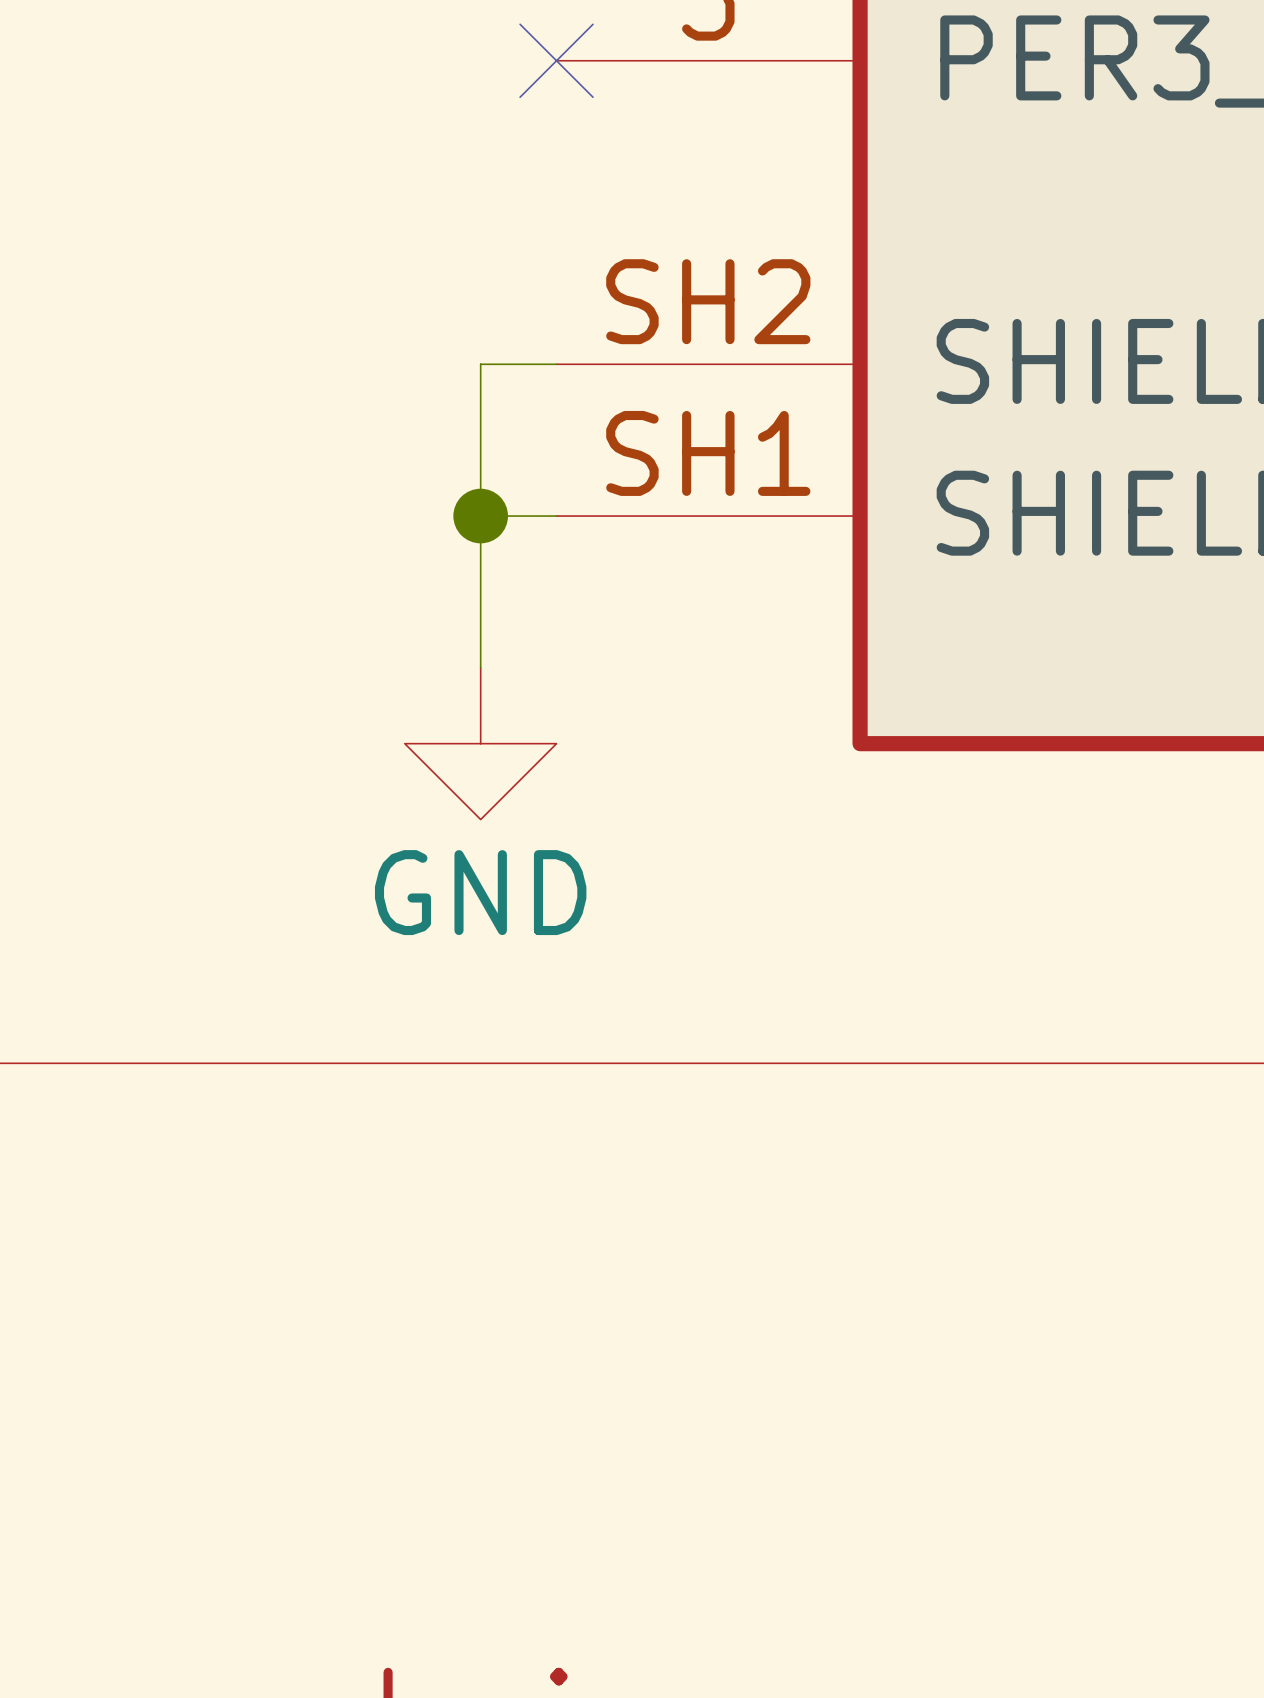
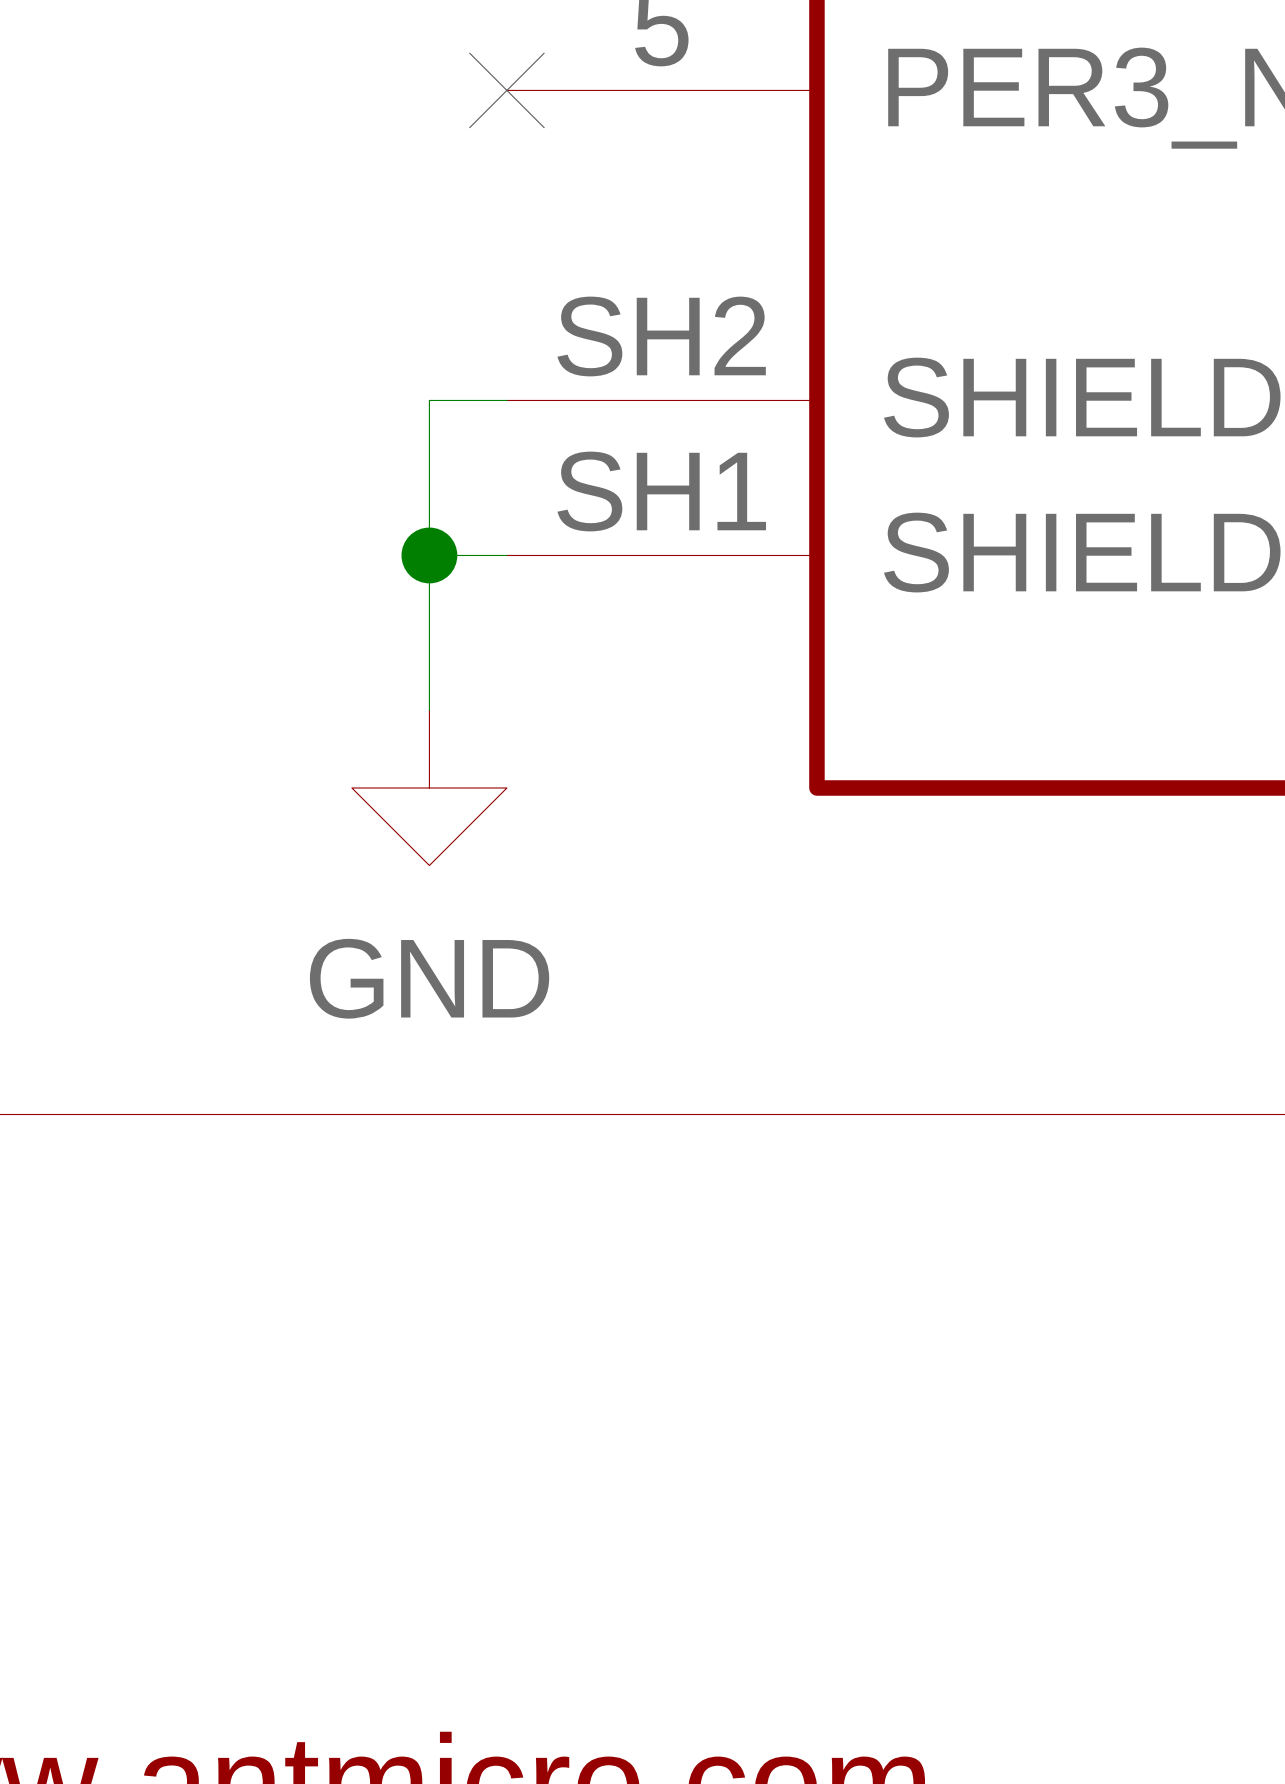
power symbol text position: GND (480, 892) -> GND (429, 978)

